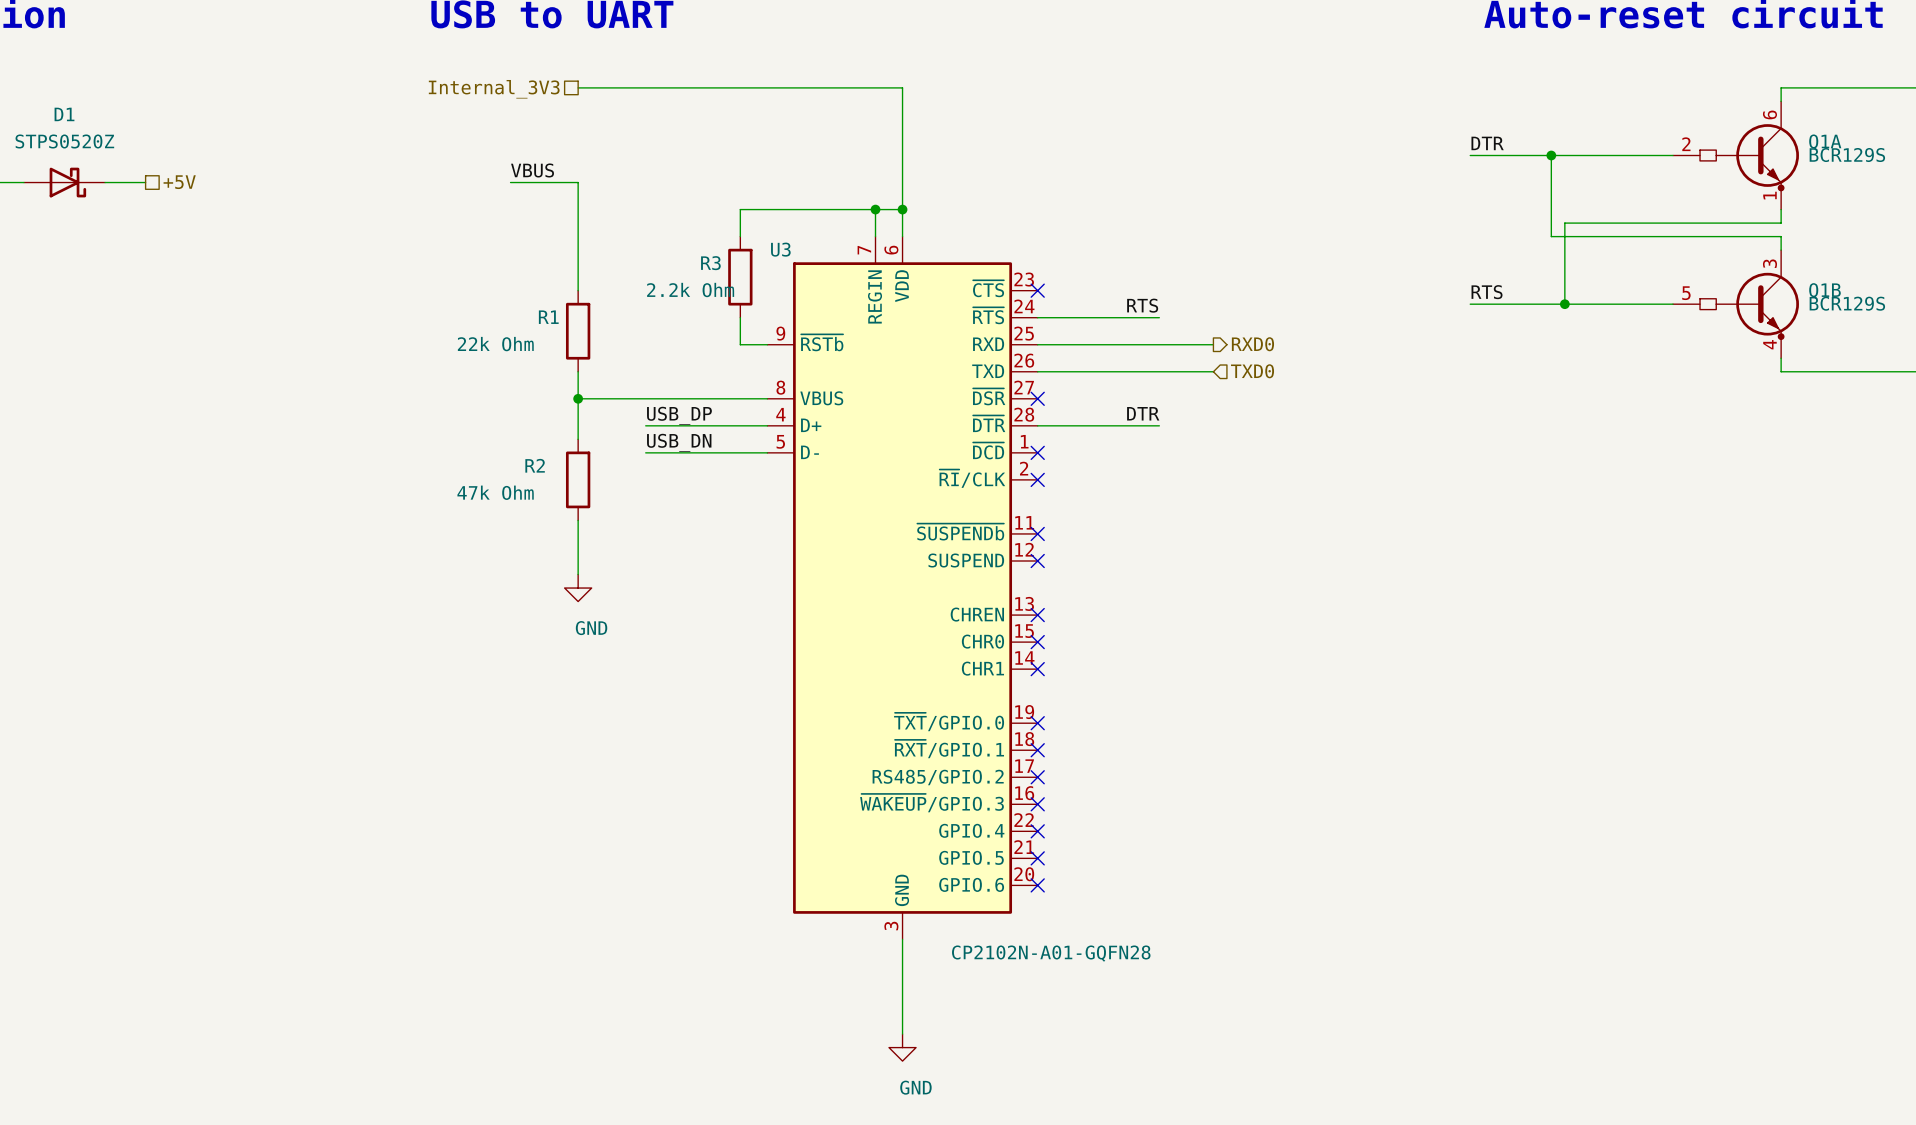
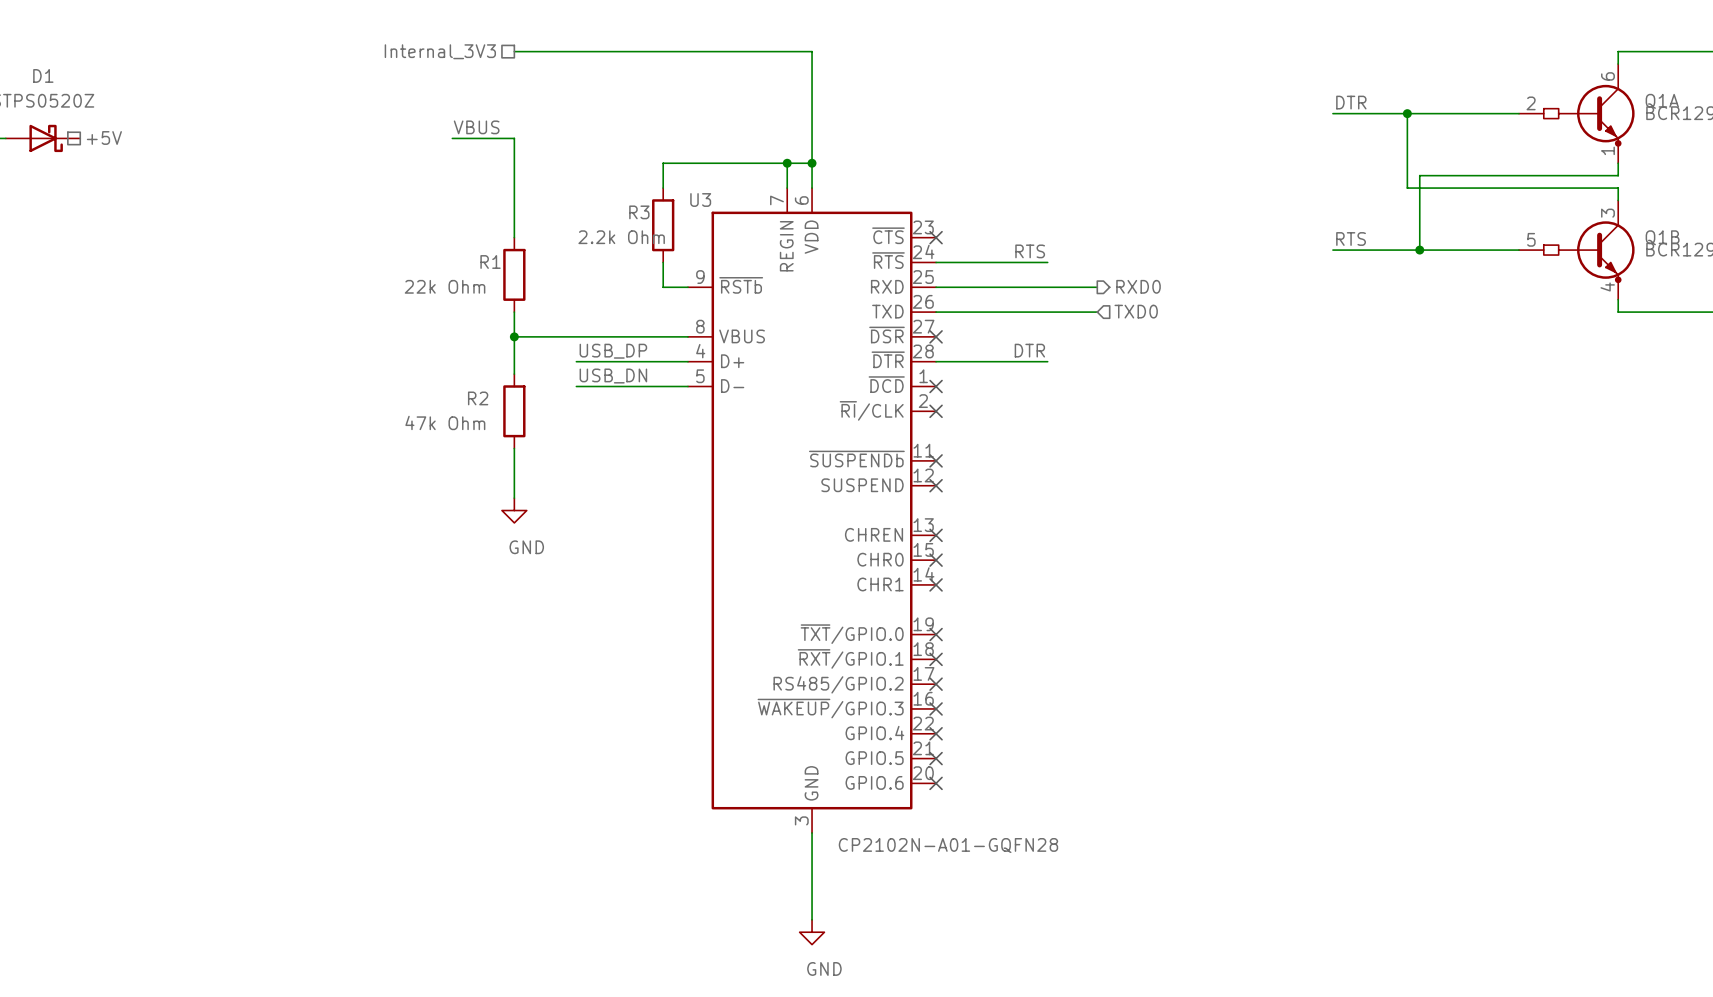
wire: (105, 182) (145, 182) -> none
hierarchical label position: +5V (179, 182) -> +5V (104, 137)

